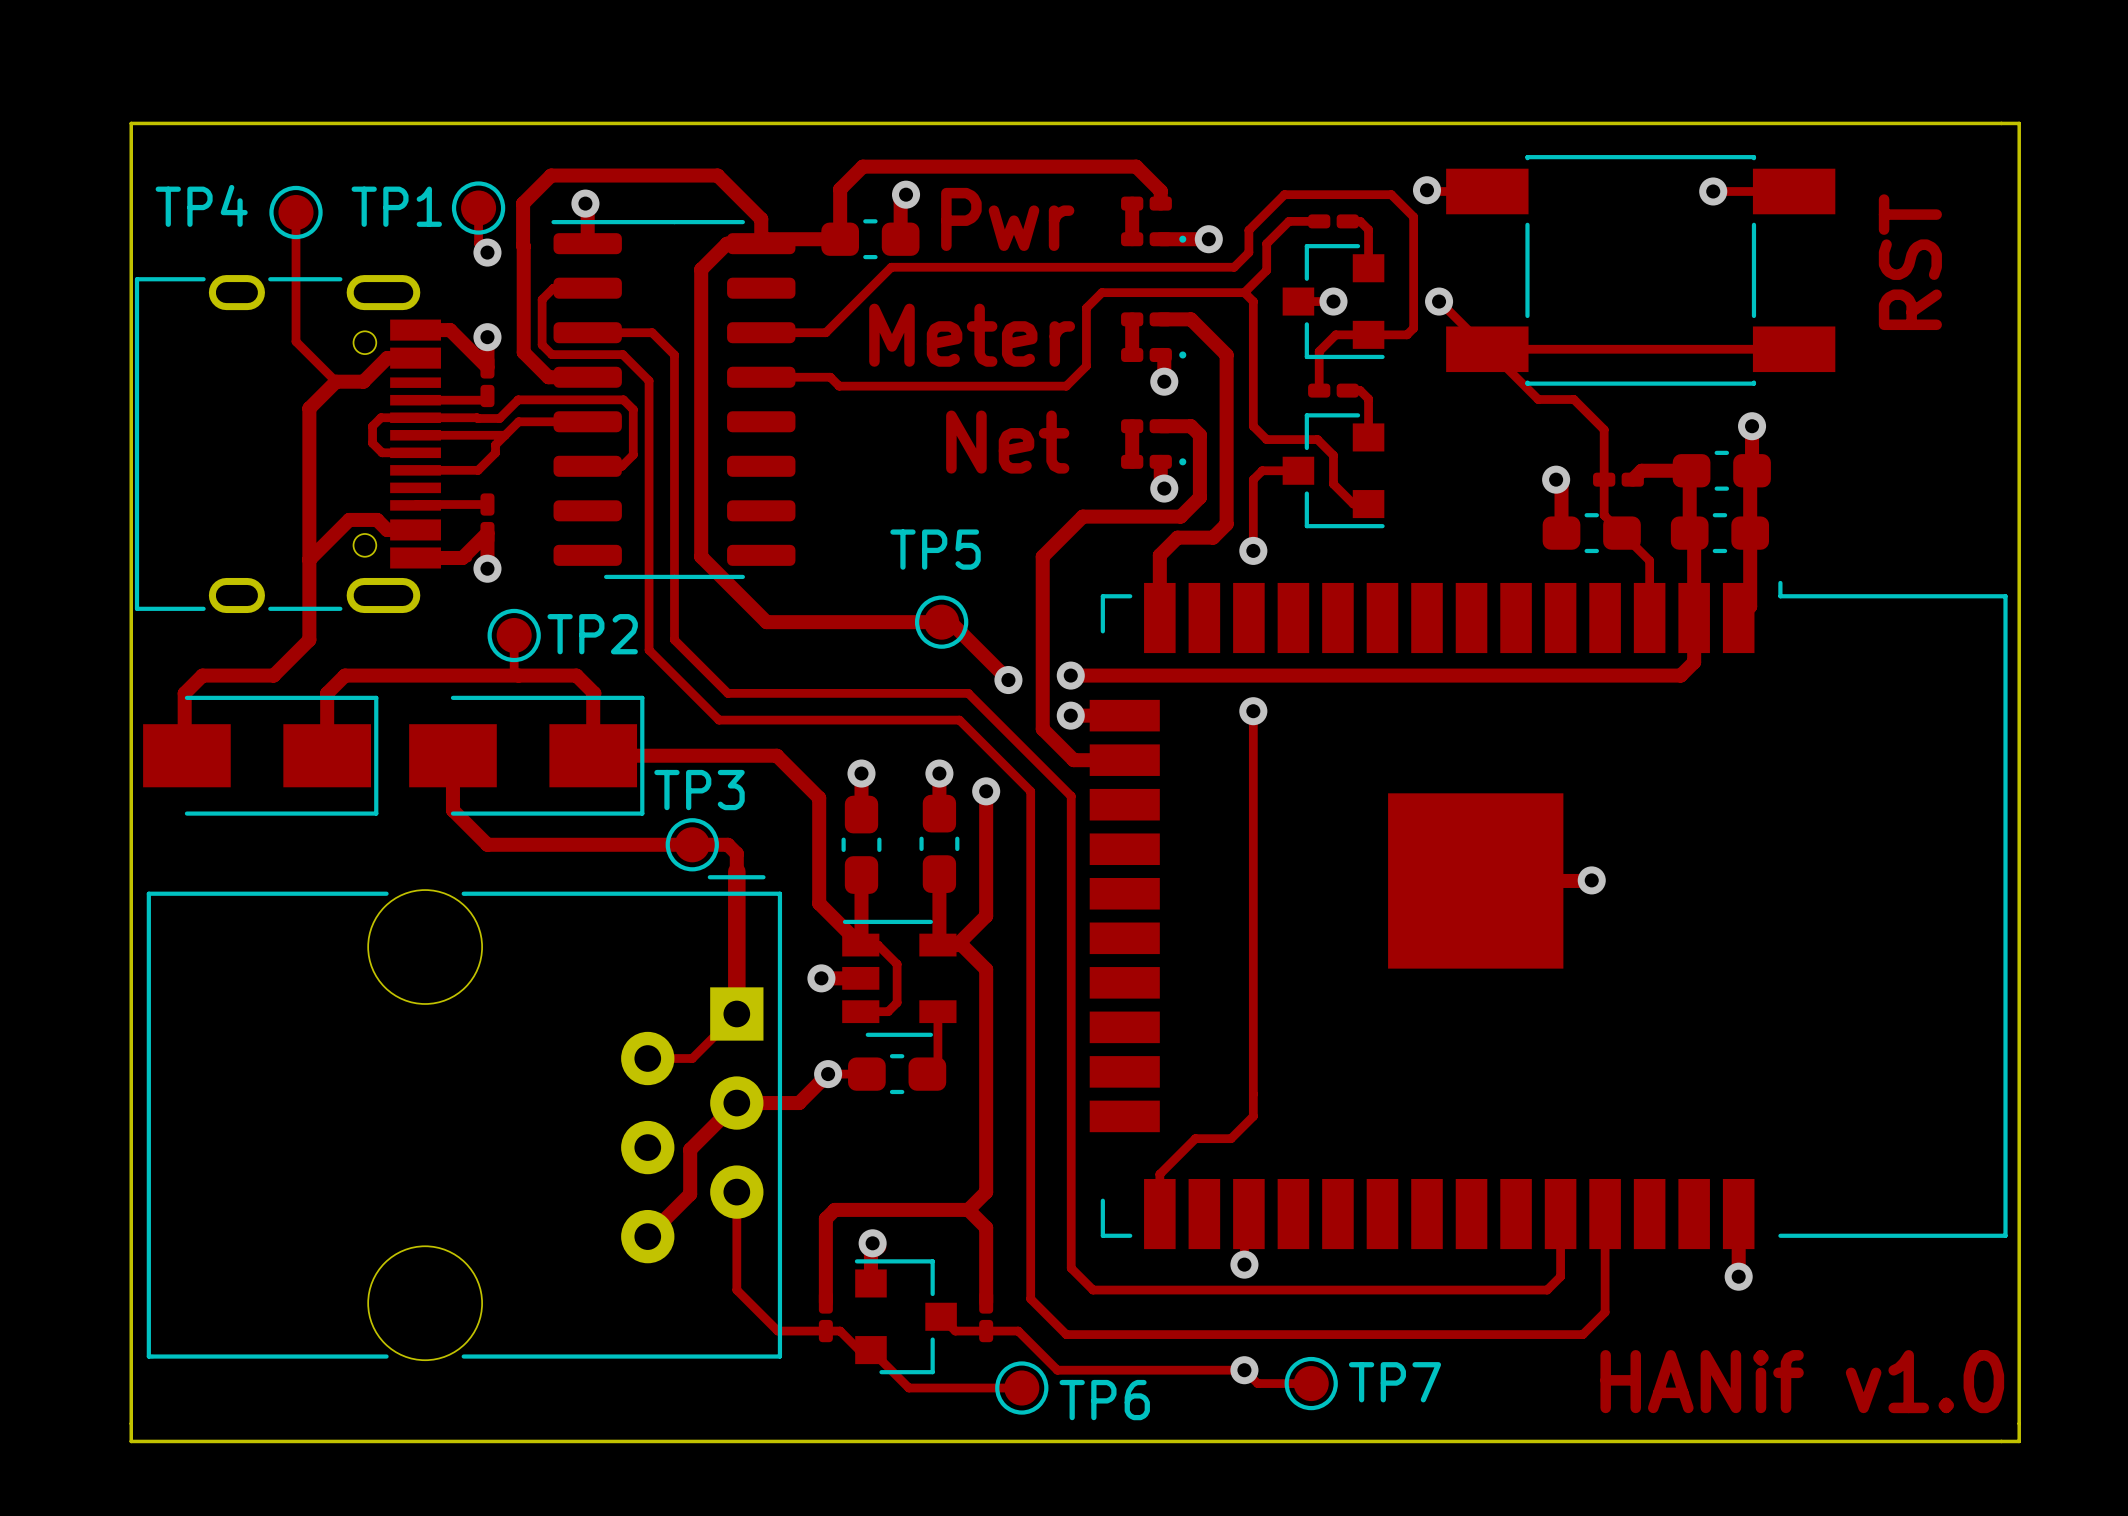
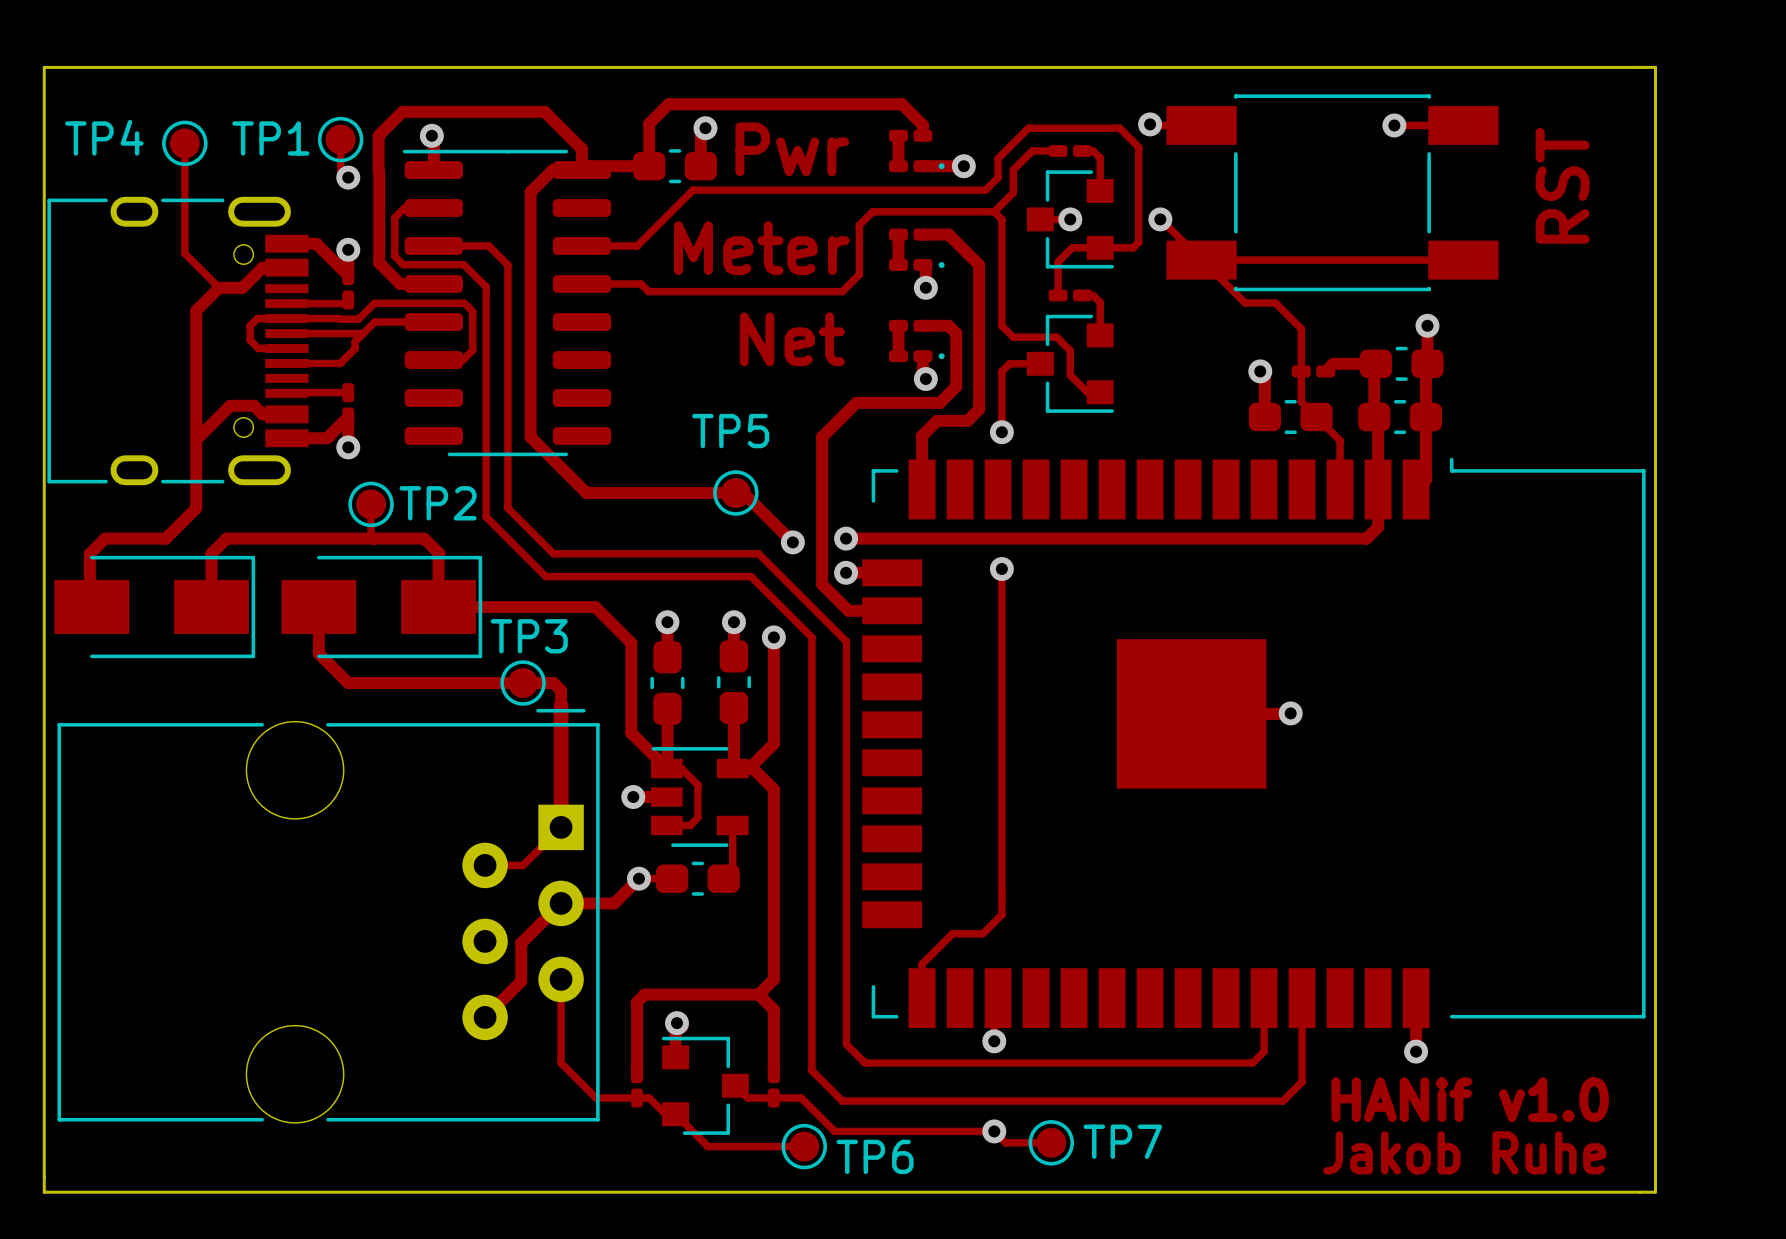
text: none -> HANif v1.0 (1470, 1099)
text: HANif v1.0 (1802, 1381) -> Jakob Ruhe (1464, 1152)

